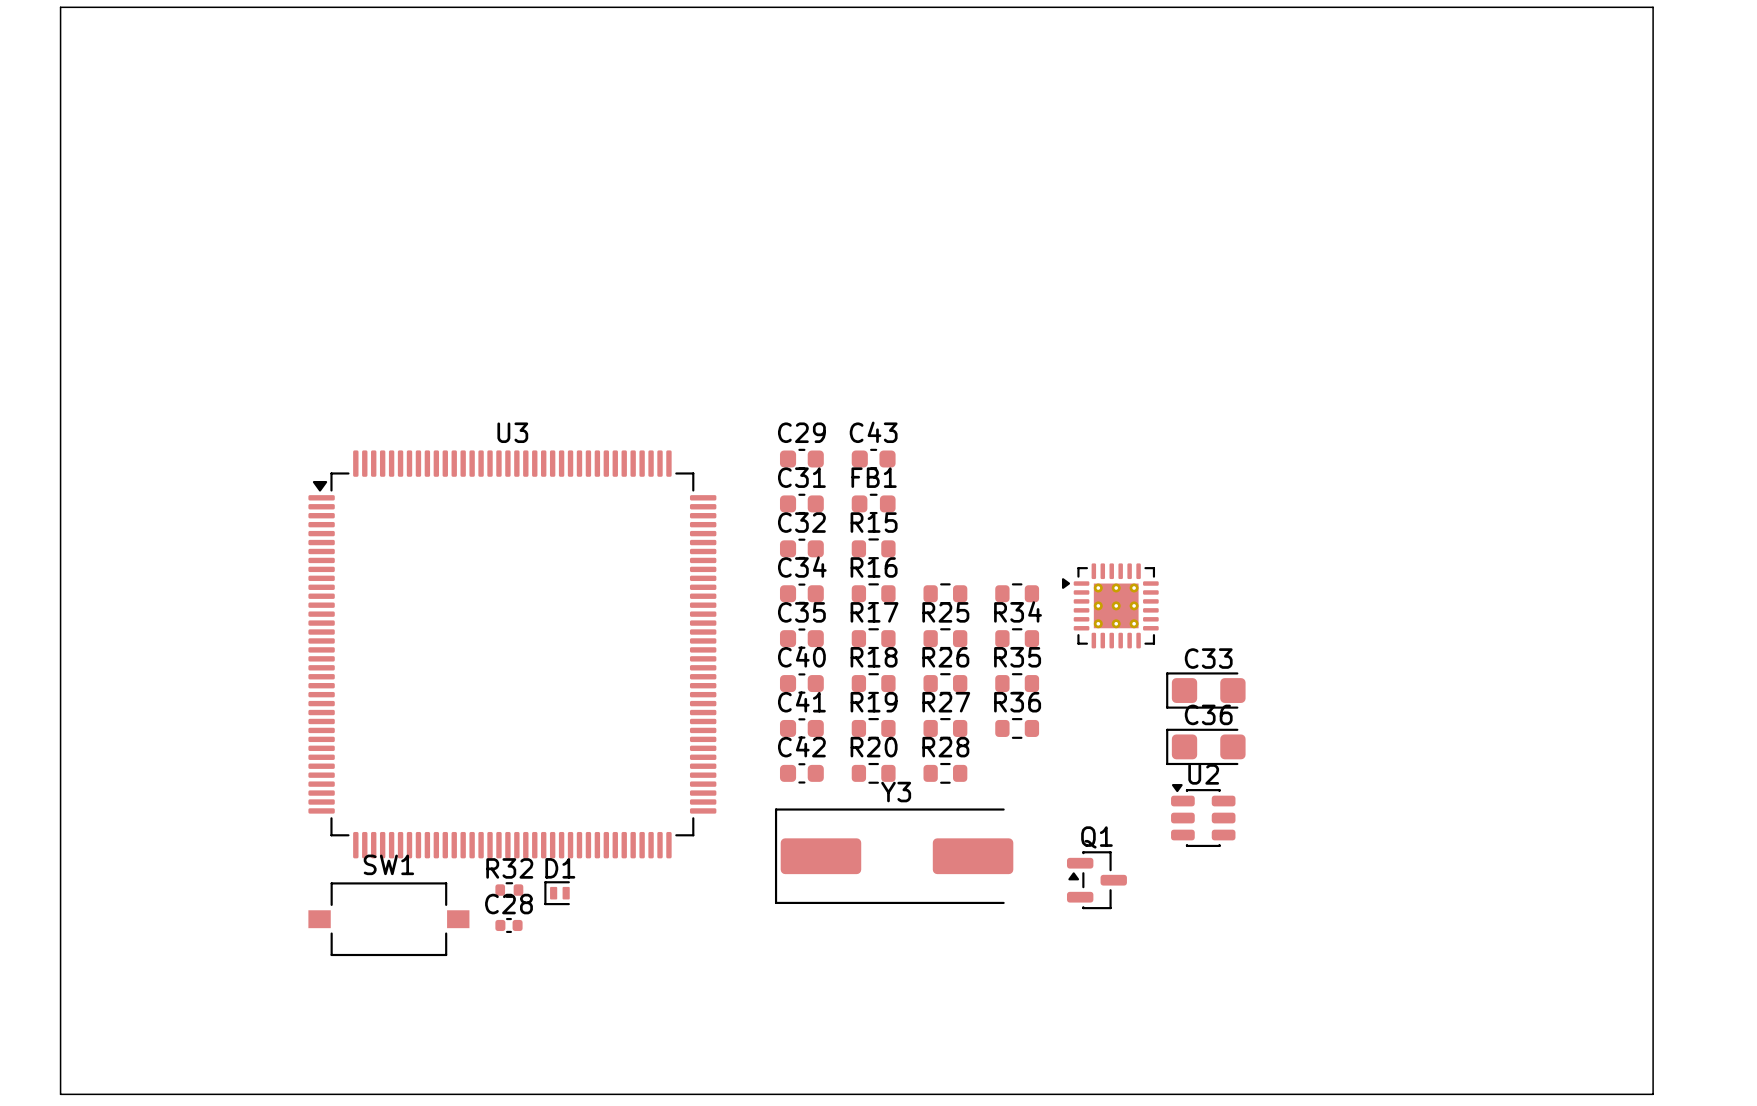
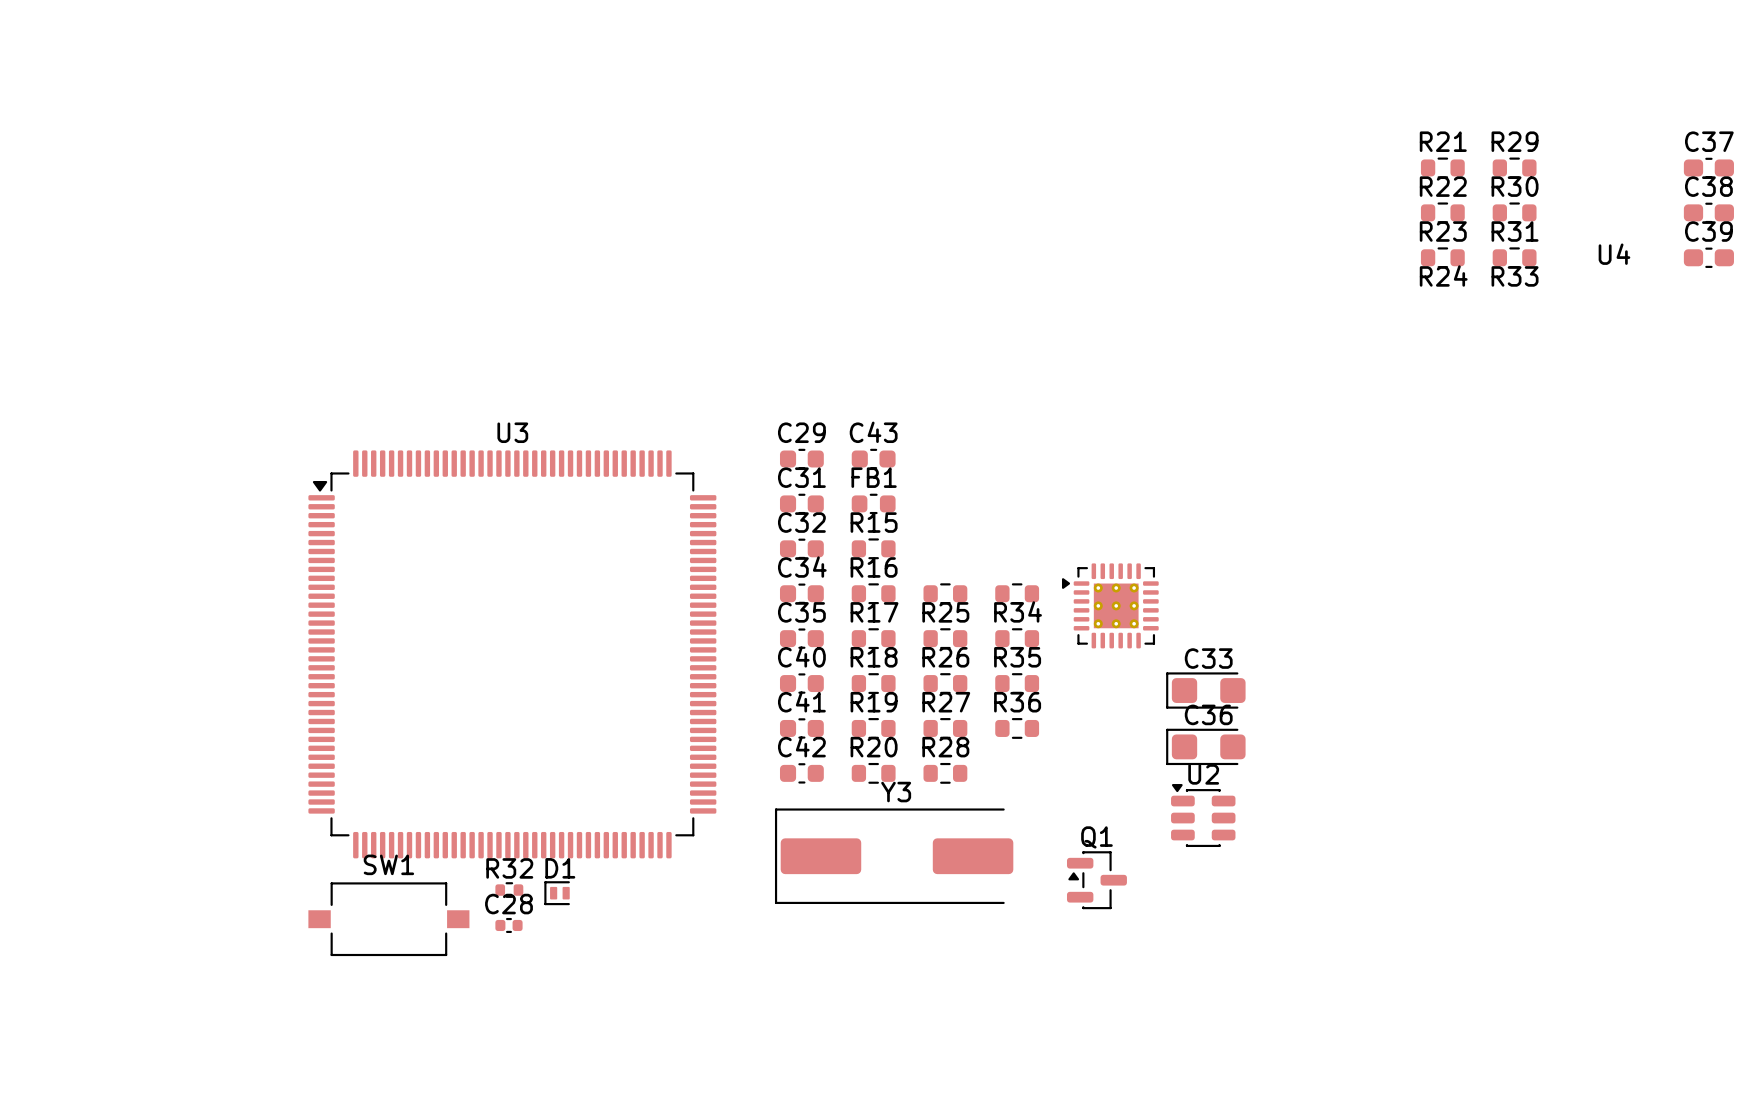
board edge: (60, 7) (1653, 7) (1653, 1094) (60, 1094) (60, 7) -> none
R21: none -> (1442, 167)
R29: none -> (1514, 167)
C37: none -> (1708, 167)
R22: none -> (1442, 212)
R30: none -> (1514, 212)
C38: none -> (1708, 212)
U4 name: none -> U4 (1614, 254)
R23: none -> (1442, 257)
R31: none -> (1514, 257)
C39: none -> (1708, 257)
R24 name: none -> R24 (1443, 276)
R33 name: none -> R33 (1515, 276)

